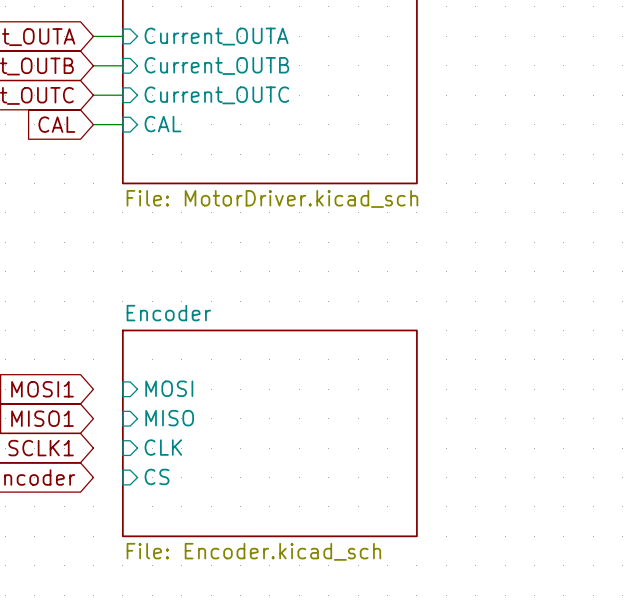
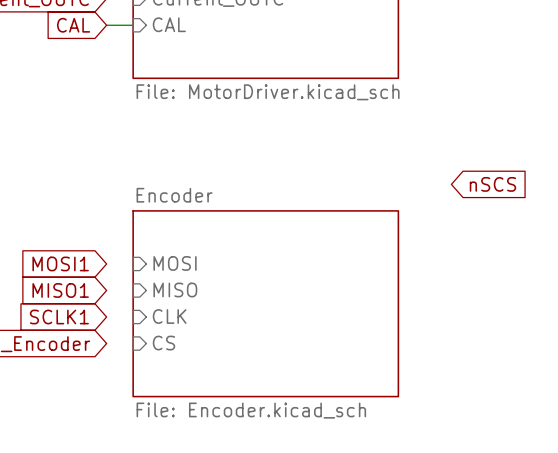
global label: none -> nSCS (492, 184)

